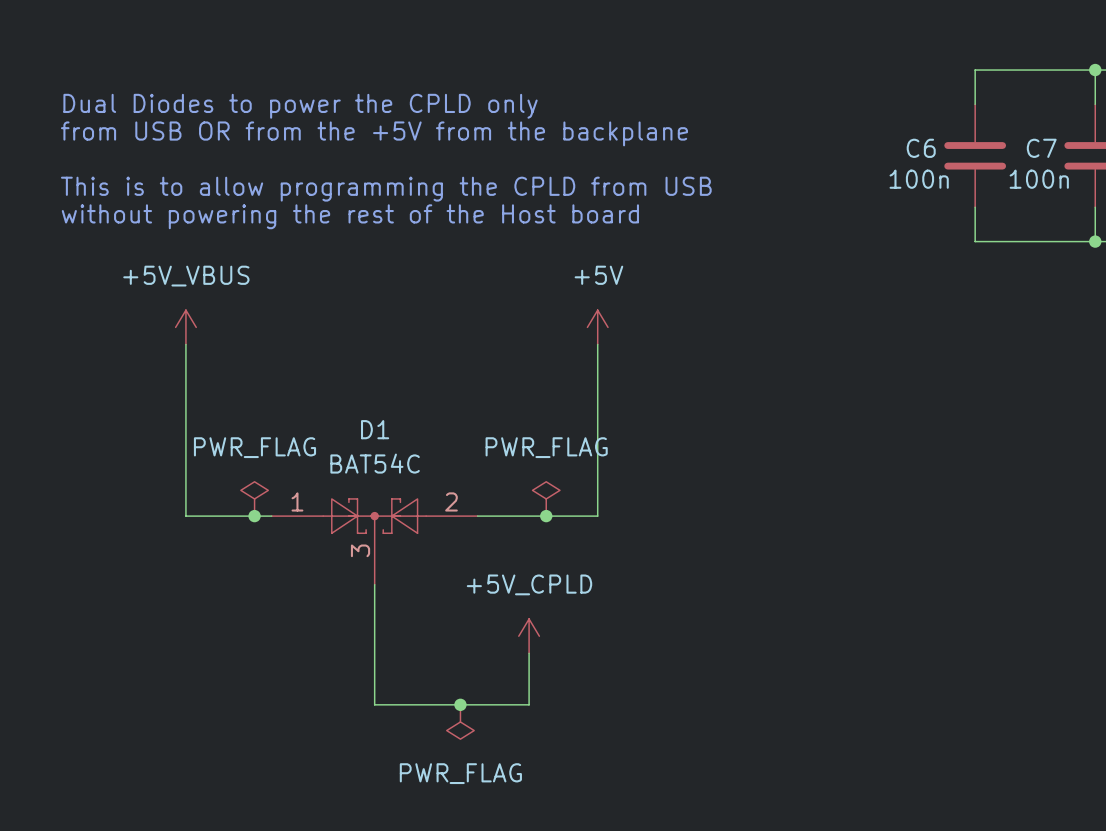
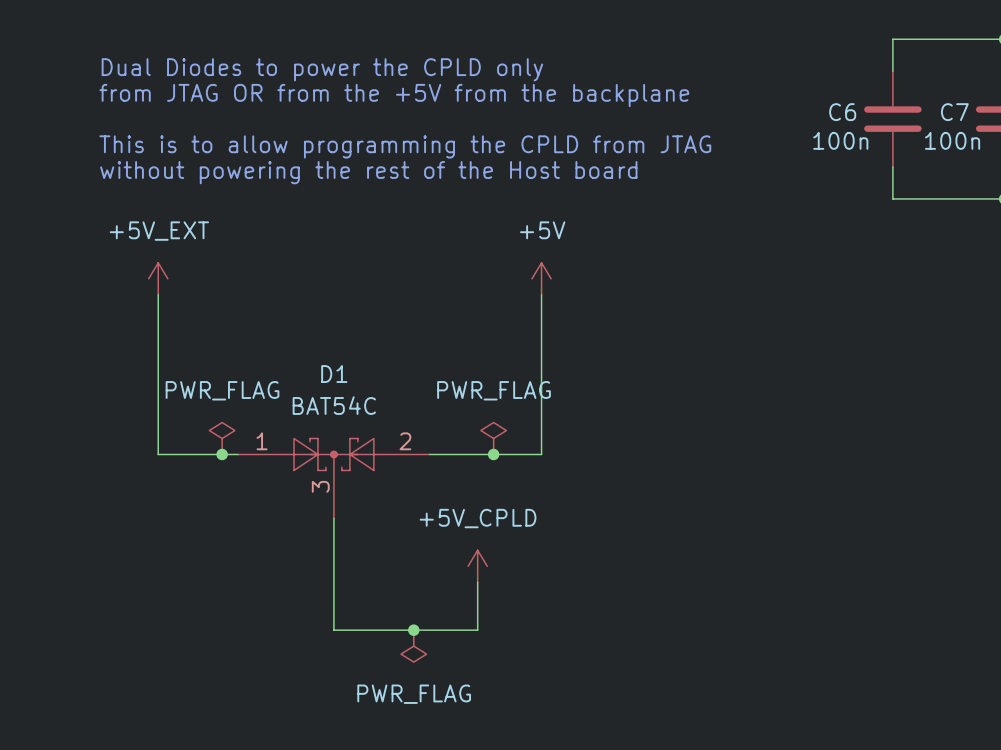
text position: Dual Diodes to power the CPLD only (300, 106) -> Dual Diodes to power the CPLD only (322, 69)
text: from USB OR from the +5V from the backplane (374, 133) -> from JTAG OR from the +5V from the backplane (394, 95)
text: This is to allow programming the CPLD from USB (386, 189) -> This is to allow programming the CPLD from JTAG (405, 146)
text position: without powering the rest of the Host board (350, 216) -> without powering the rest of the Host board (368, 172)
power symbol: +5V_VBUS (185, 327) -> +5V_EXT (158, 278)

